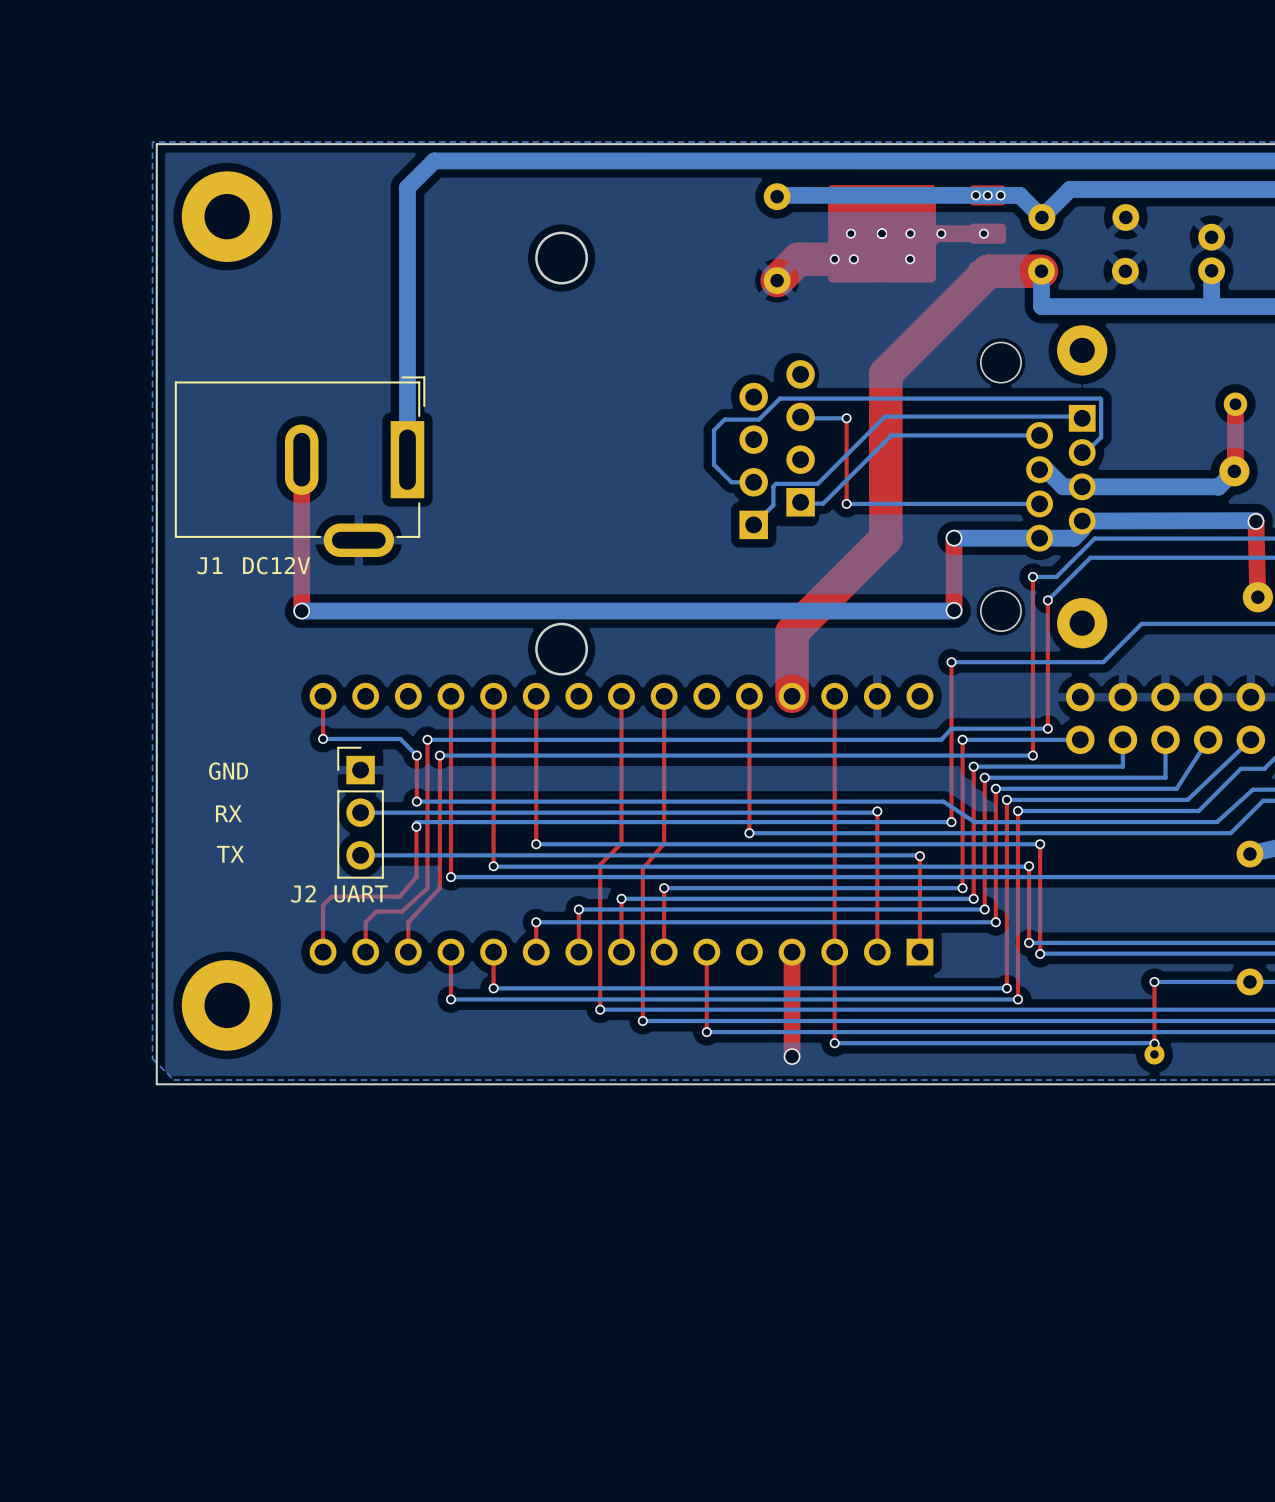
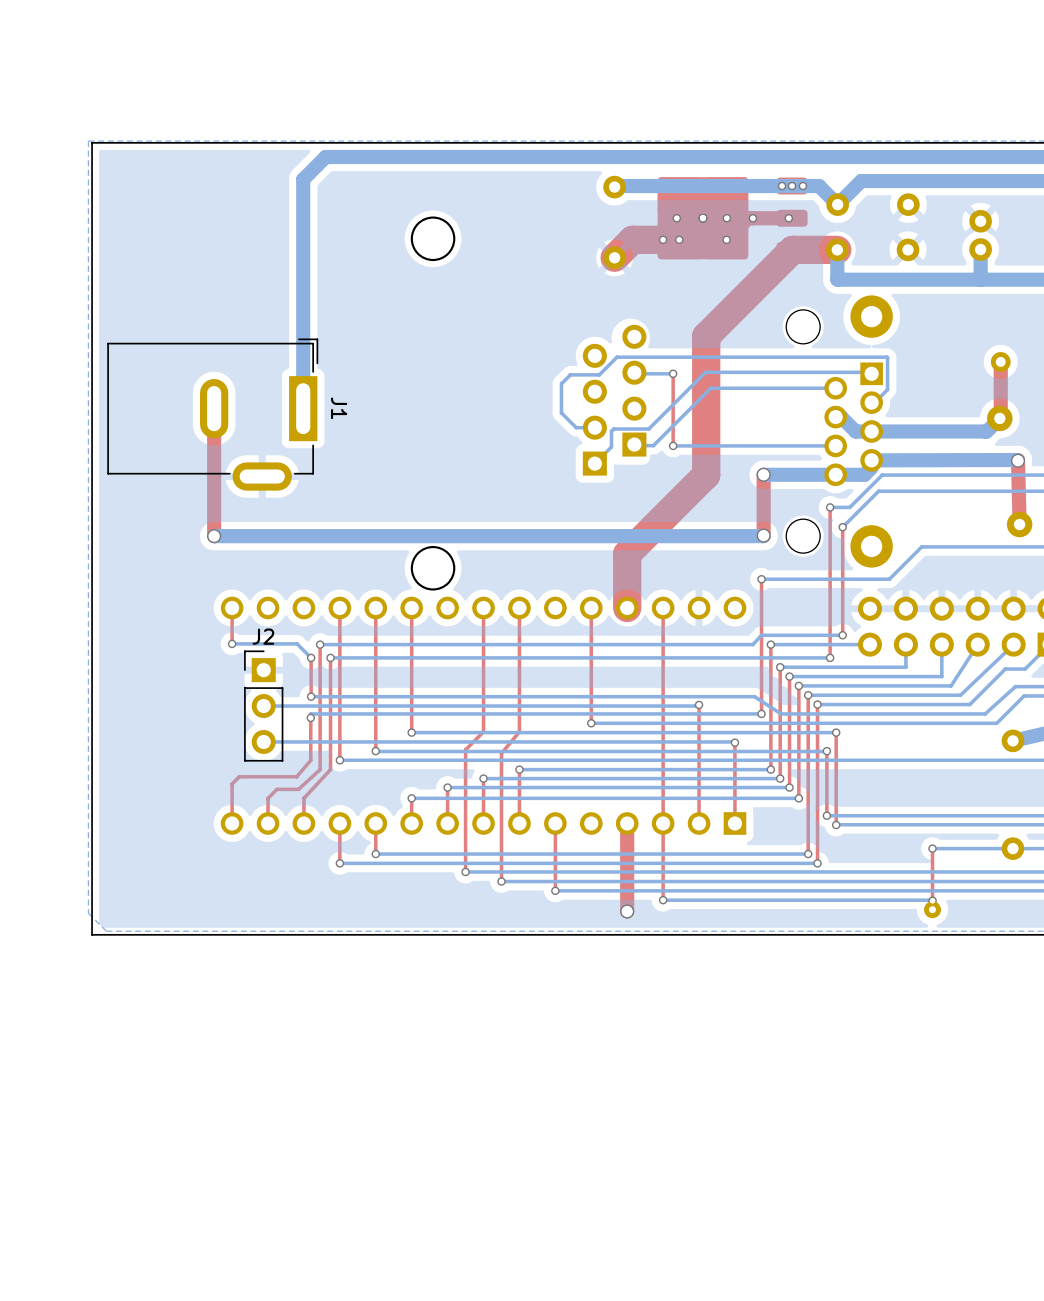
part: (227, 216) -> none
J1 name rotation: 0° (209, 565) -> 90° clockwise (339, 408)
J1 name position: J1 (209, 565) -> J1 (339, 408)
J1 value: DC12V (276, 565) -> none
text: GND (228, 771) -> none
text: RX (228, 813) -> none
text: TX (230, 854) -> none
J2 name position: J2 (303, 893) -> J2 (263, 636)
J2 value: UART (361, 893) -> none
part: (227, 1005) -> none

